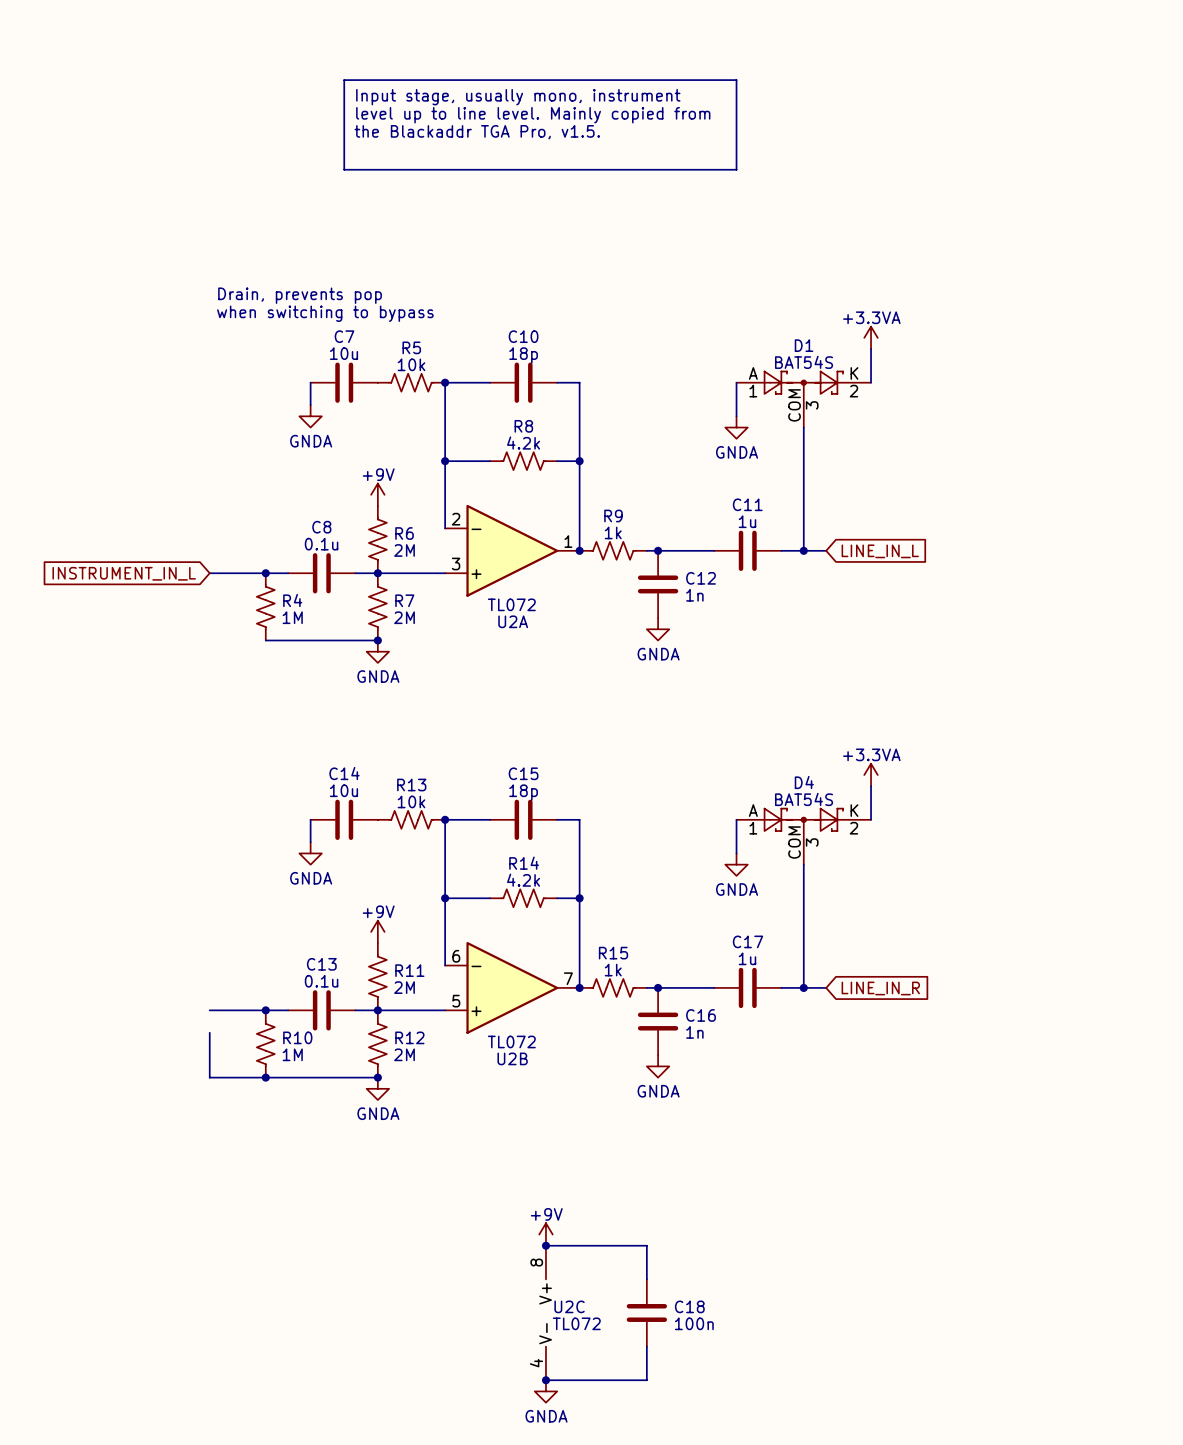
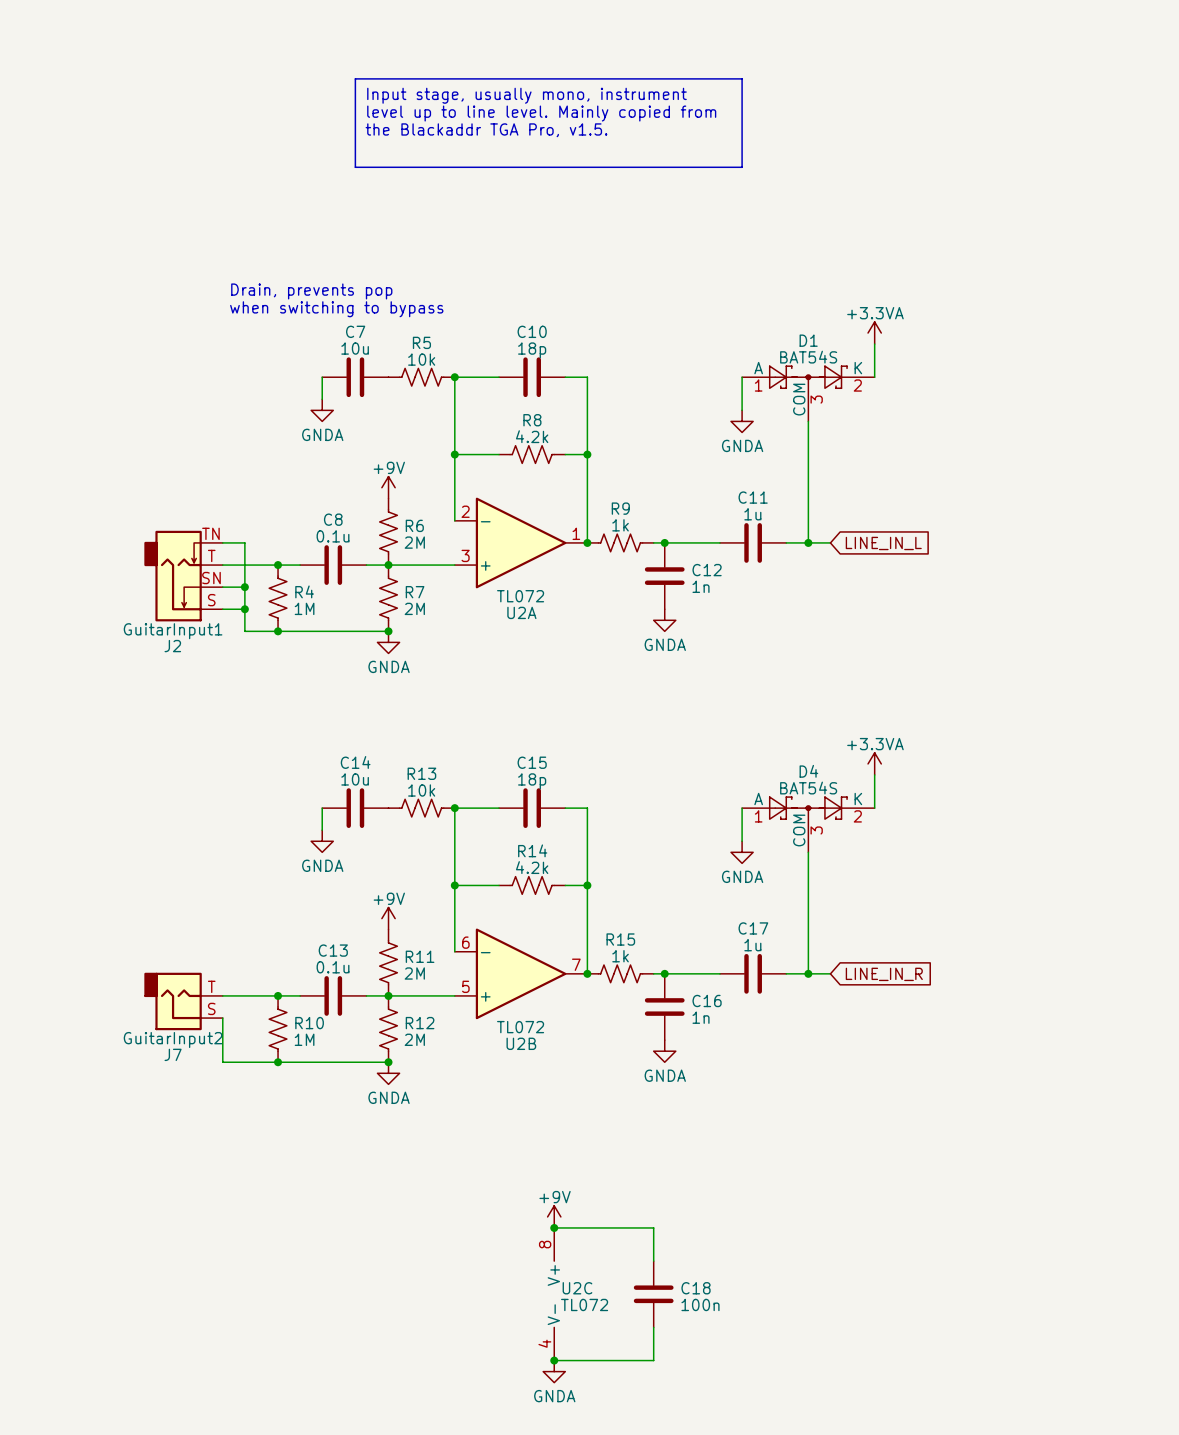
wire: none -> (222, 542) (244, 542) (244, 631) (278, 631)
global label: INSTRUMENT_IN_L (124, 573) -> none
J2: none -> GuitarInput1 (183, 576)
wire: none -> (222, 587) (244, 587)
junction: none -> (244, 587)
wire: none -> (222, 609) (244, 609)
junction: none -> (244, 609)
junction: none -> (278, 631)
J7: none -> GuitarInput2 (183, 1001)

